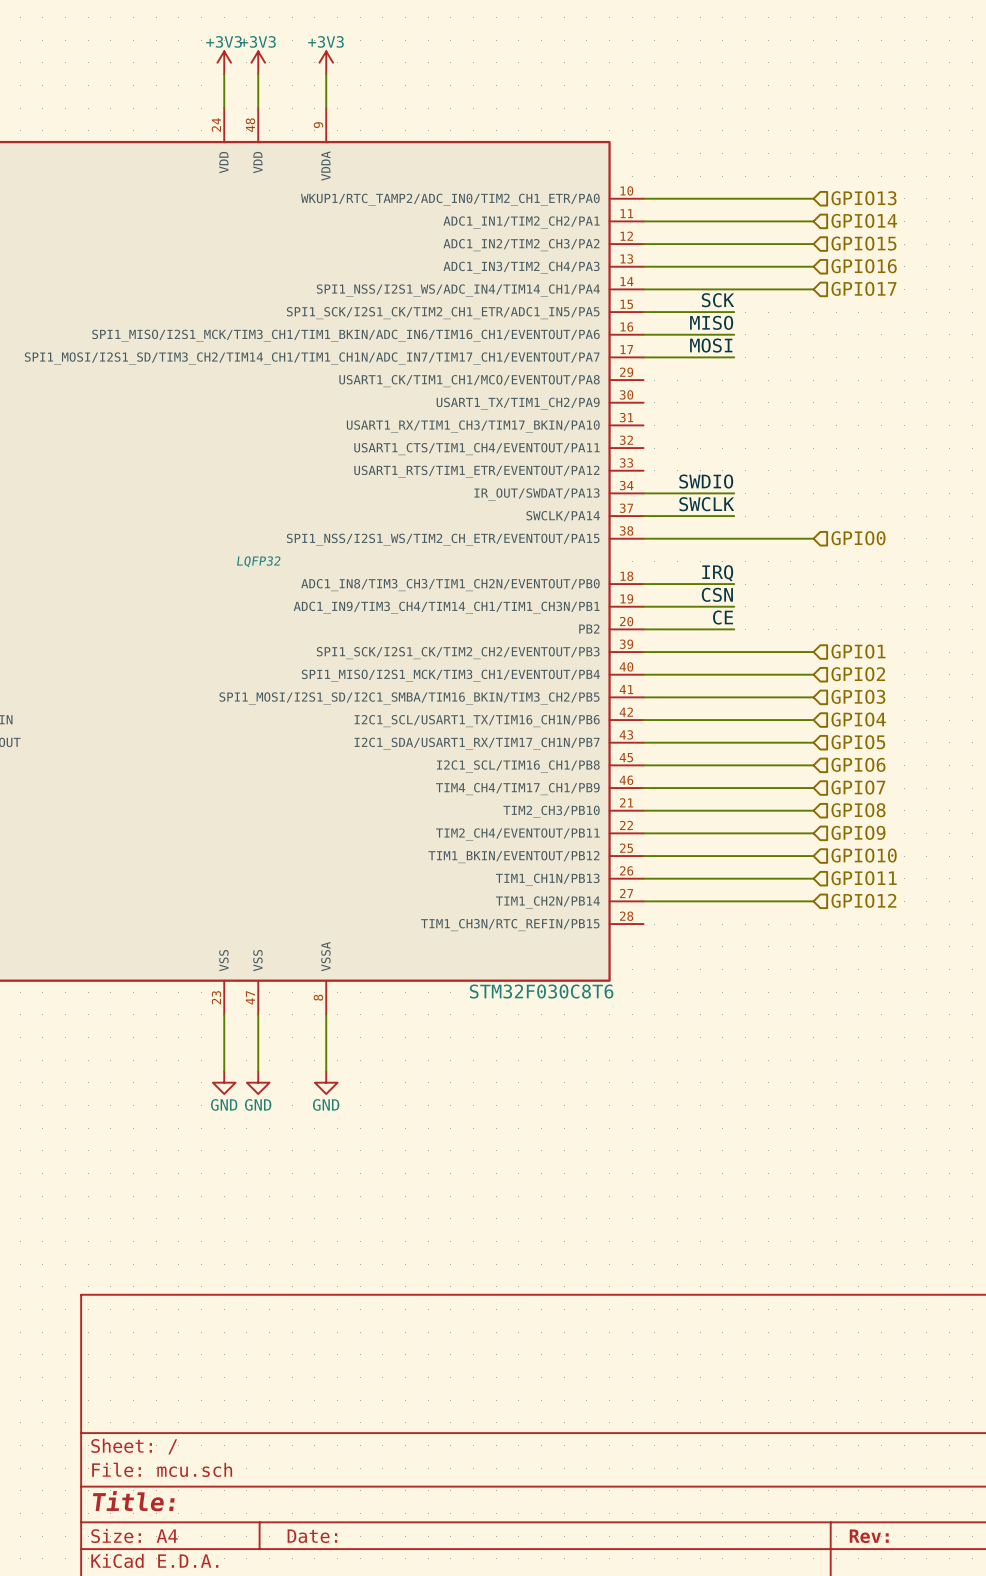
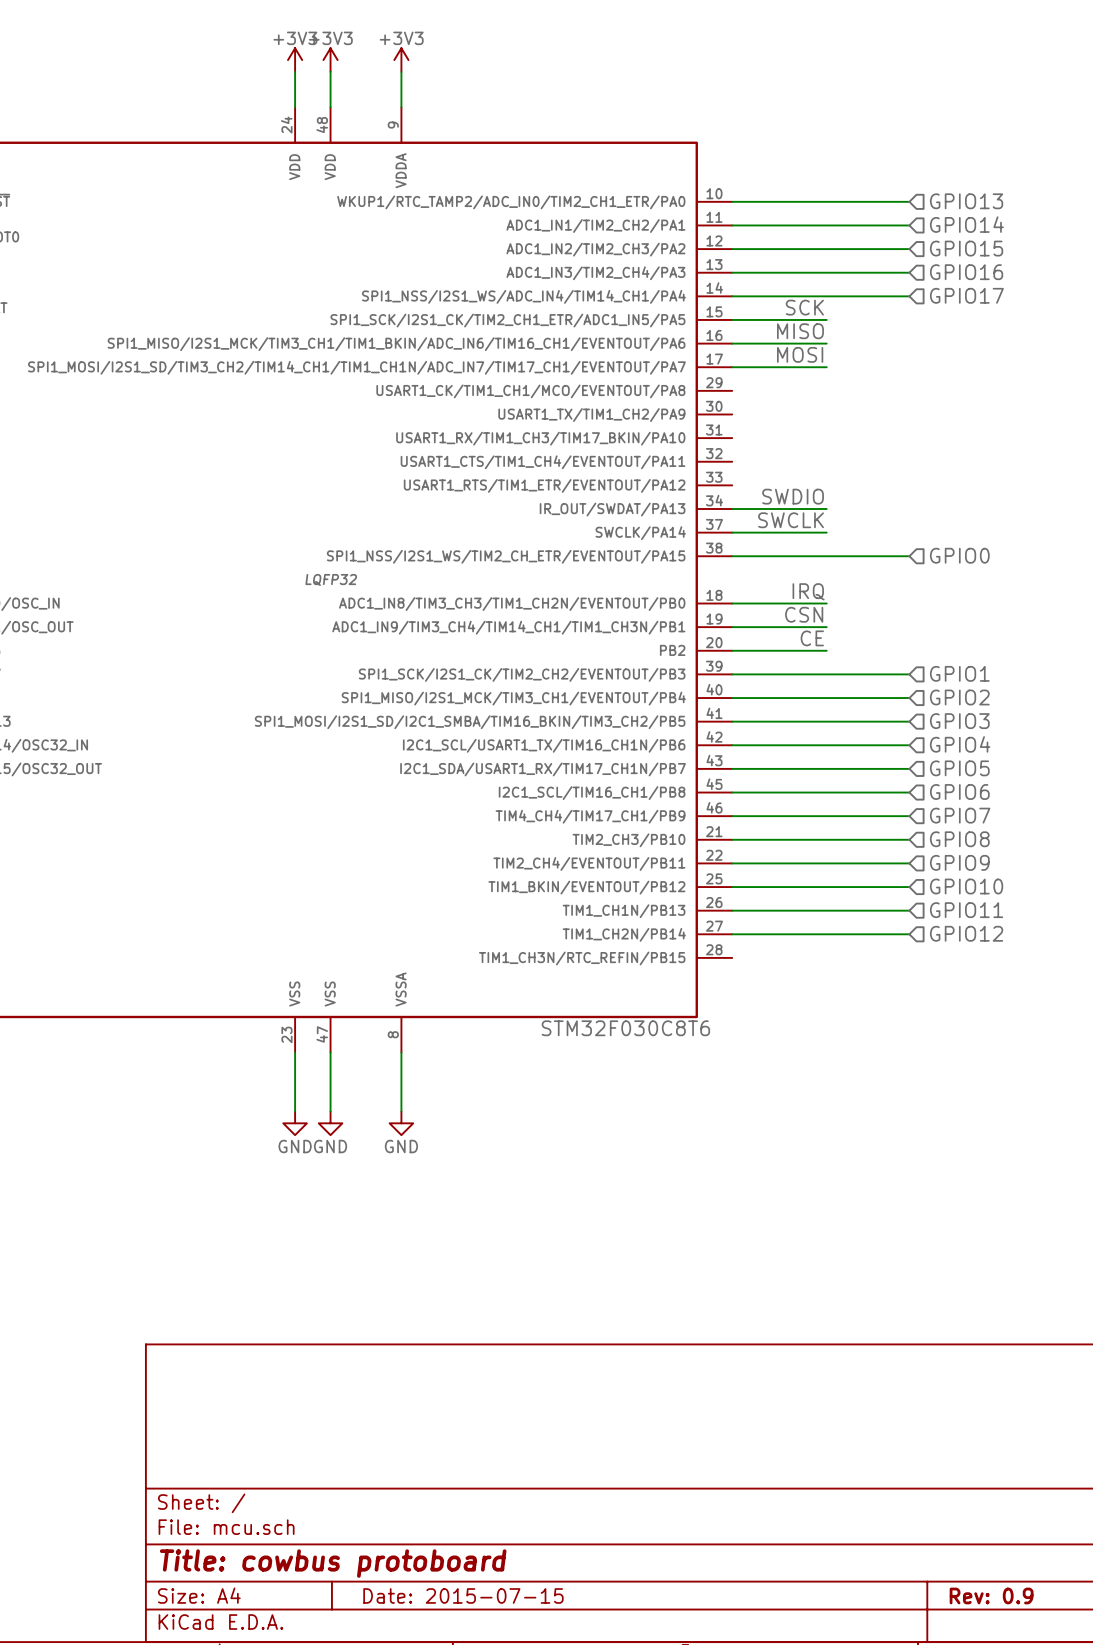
title block: Title: (133, 1501) -> Title: cowbus protoboard (333, 1563)
title block: Date: (312, 1536) -> Date: 2015-07-15 (463, 1595)
title block: Rev: (869, 1536) -> Rev: 0.9 (991, 1595)

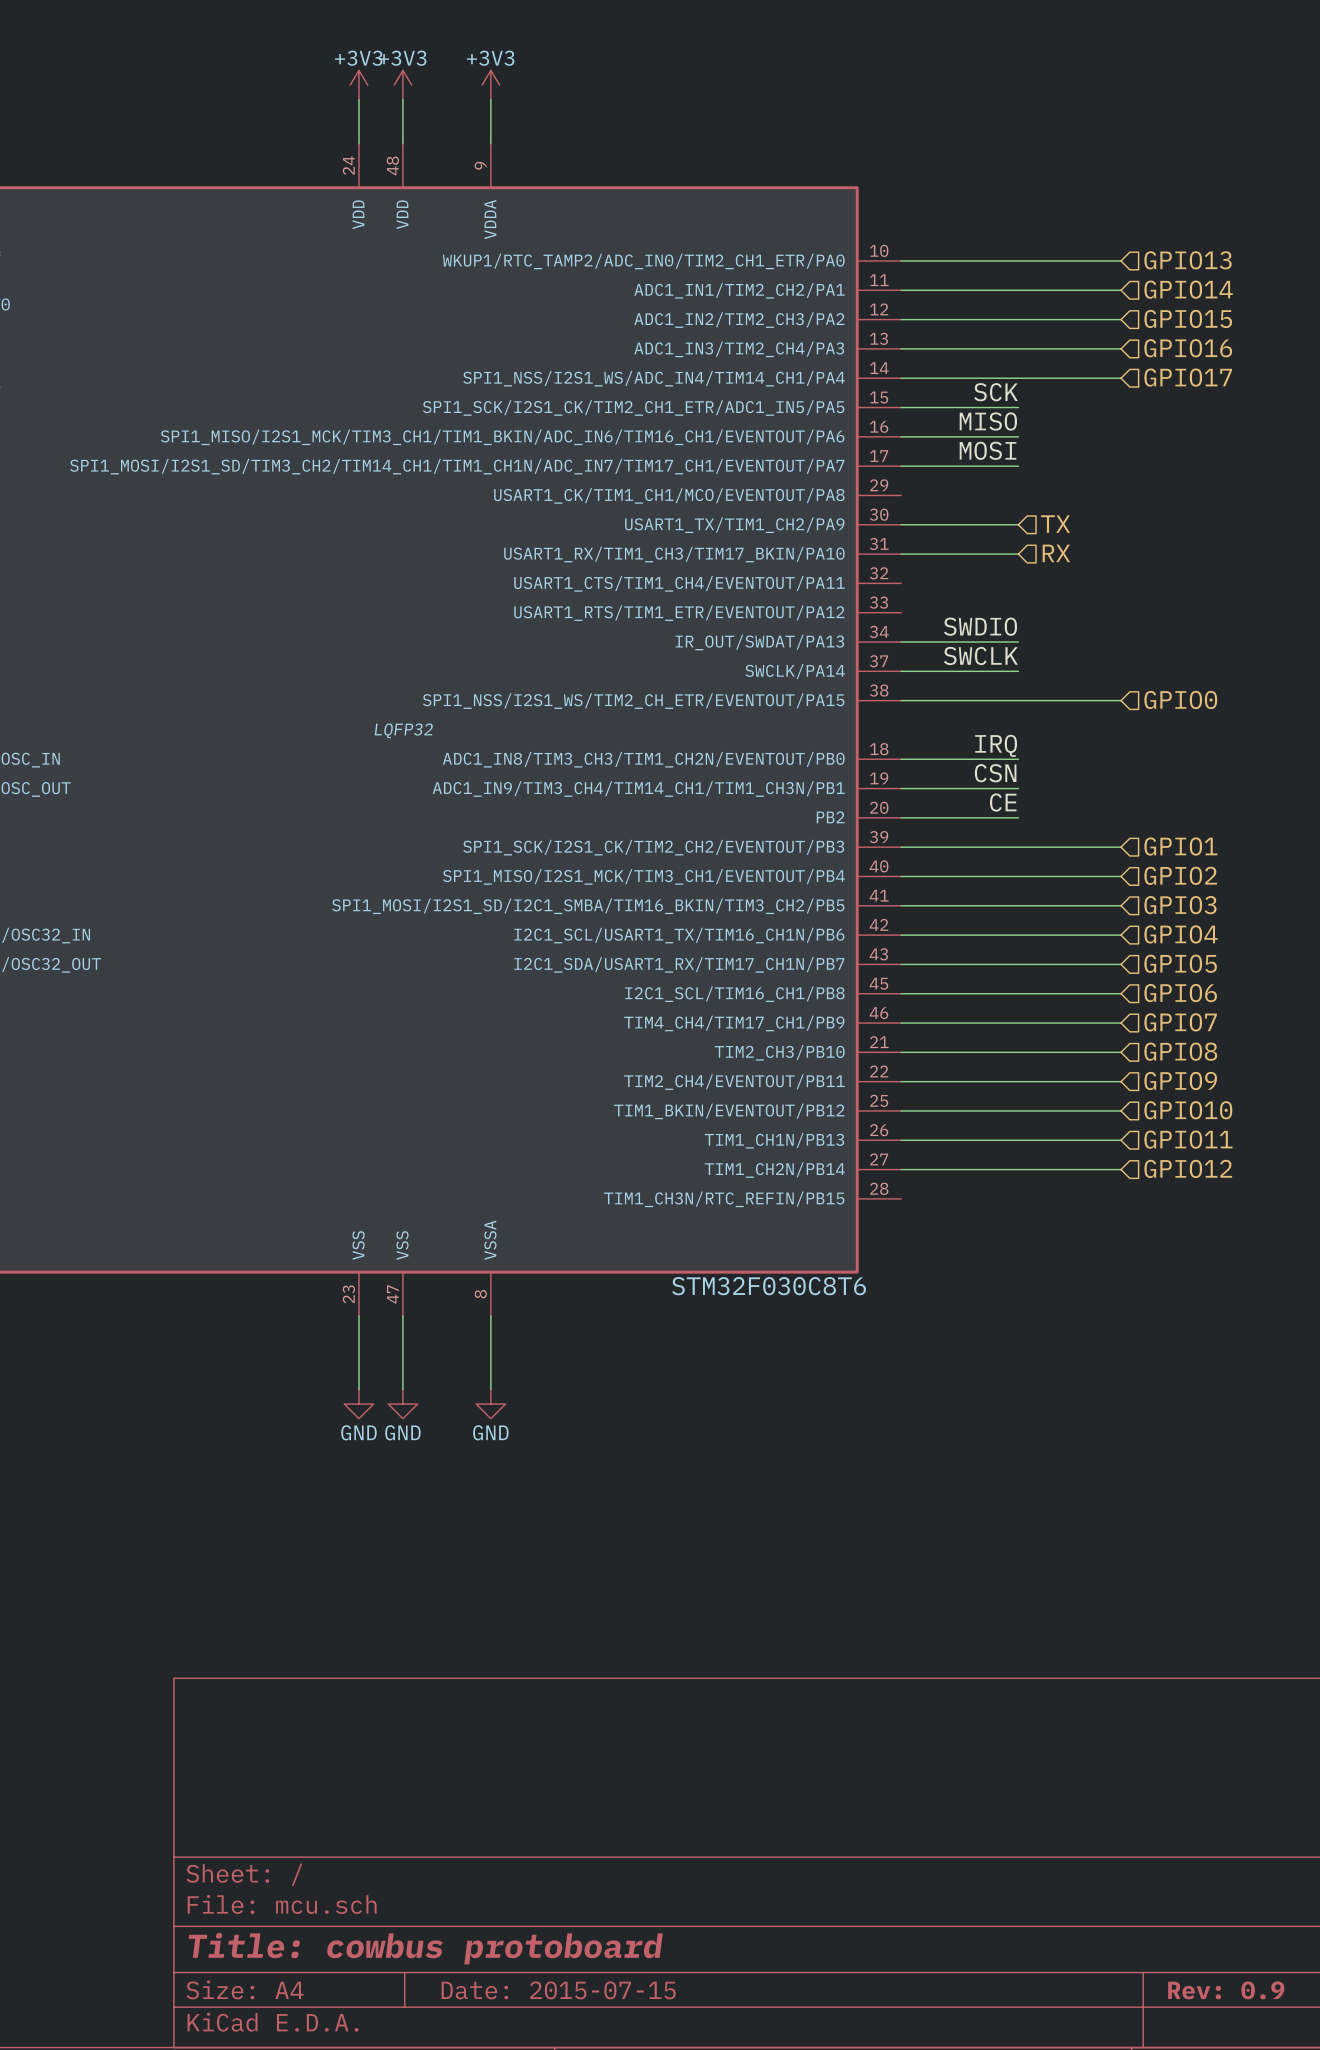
hierarchical label: none -> TX (1055, 524)
wire: none -> (901, 524) (1018, 524)
hierarchical label: none -> RX (1056, 553)
wire: none -> (901, 554) (1018, 554)

